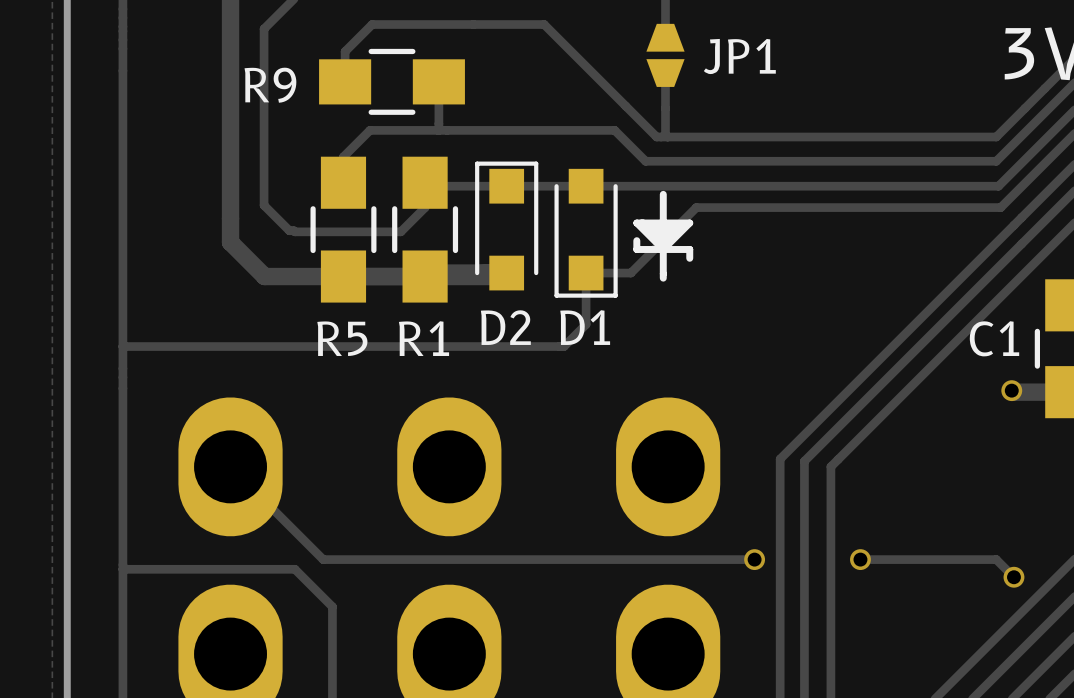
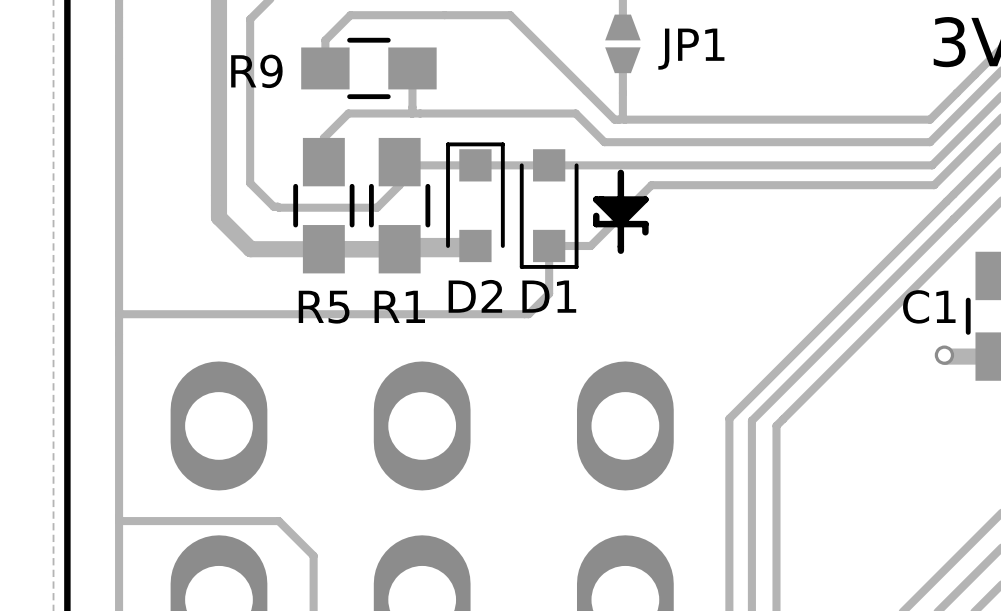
track: (230, 466) (323, 559) (754, 559) -> none
via: (754, 559) -> none
track: (860, 559) (996, 559) (1013, 577) -> none
via: (860, 559) -> none
via: (1013, 577) -> none

